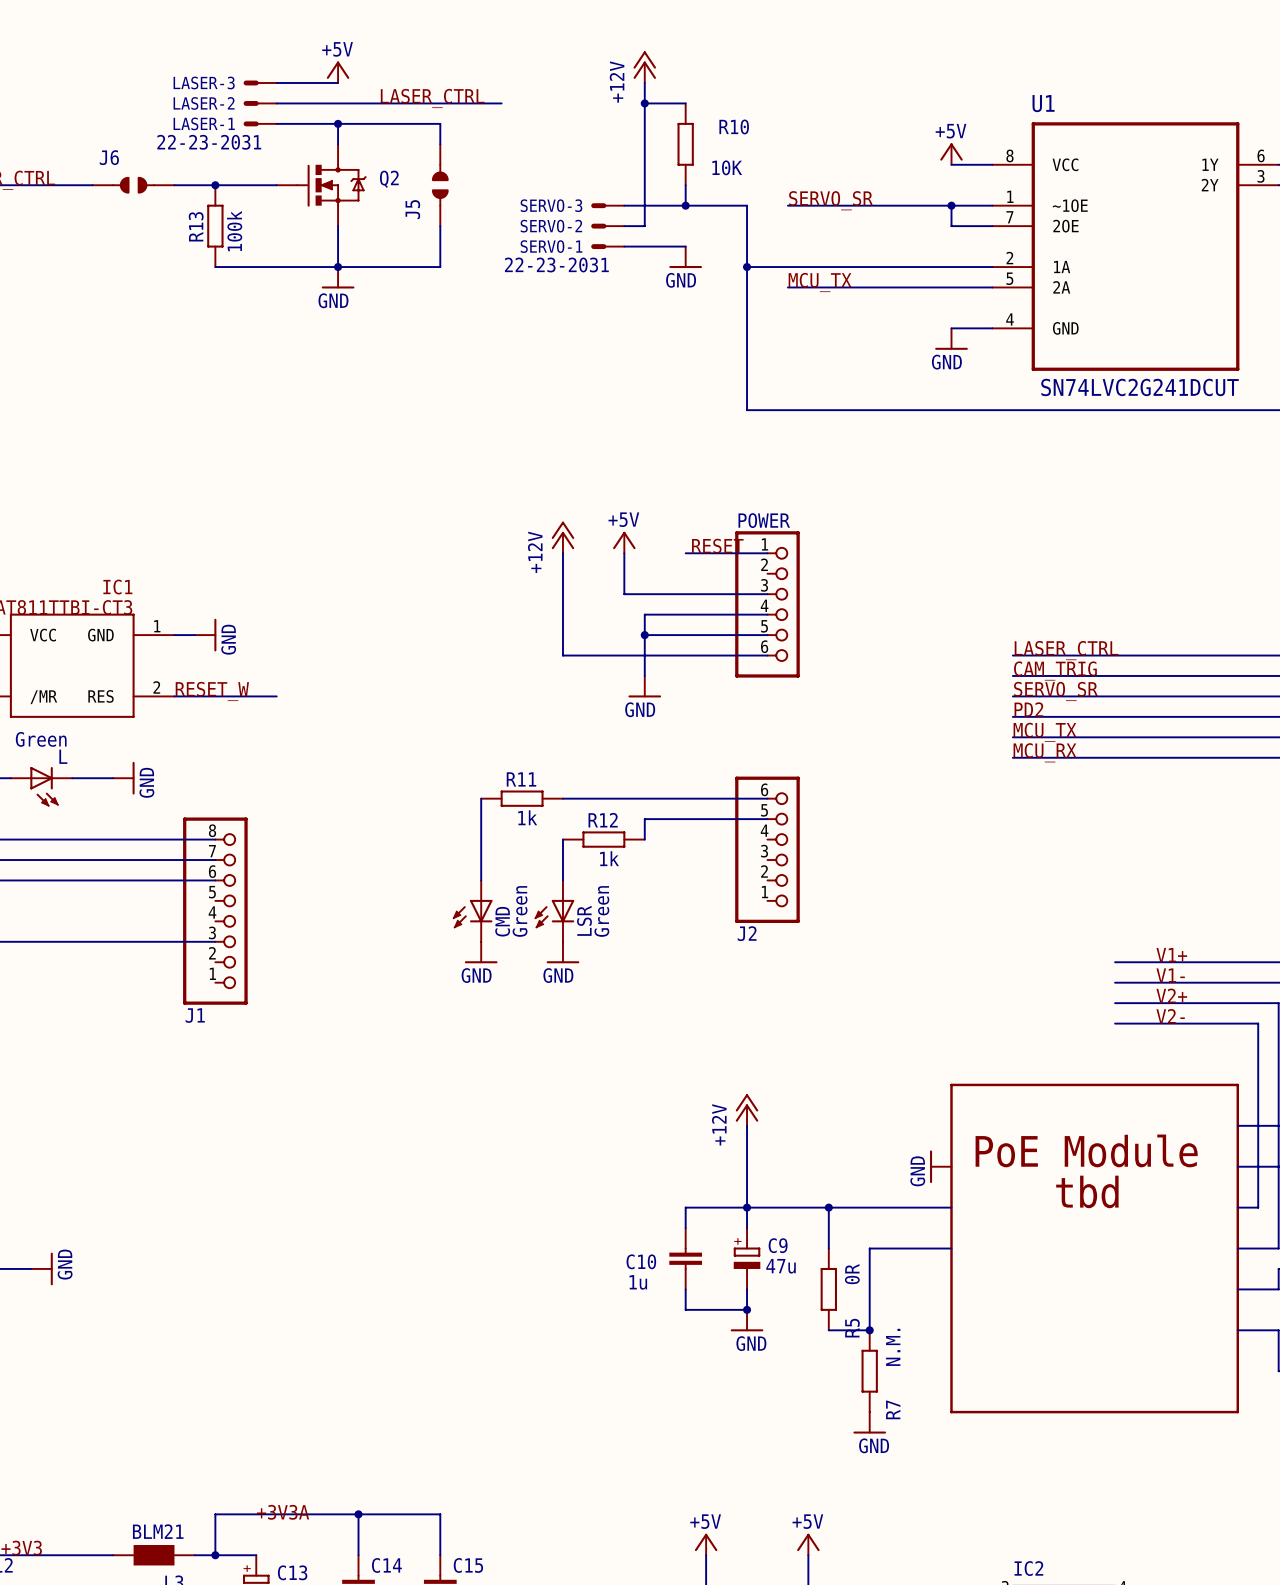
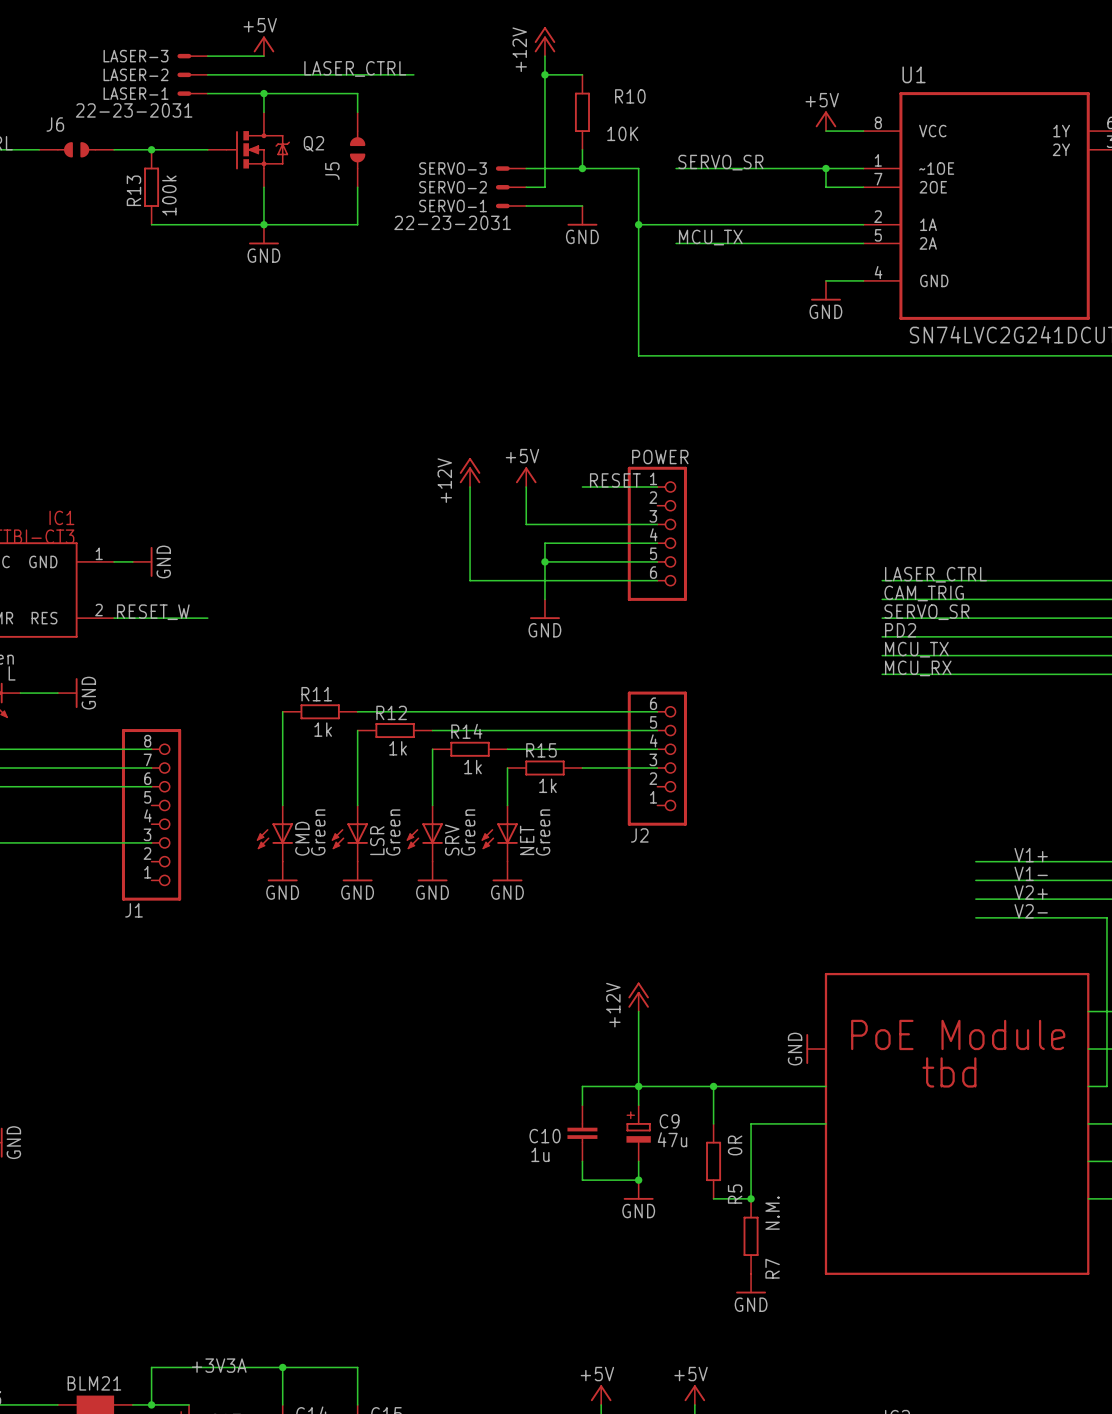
wire: none -> (282, 711) (282, 805)
wire: none -> (357, 711) (470, 711)
wire: (481, 798) (481, 880) -> (357, 730) (357, 805)
R11 position: (522, 798) -> (320, 711)
wire: (644, 819) (644, 839) -> (544, 730) (432, 730)
wire: none -> (432, 749) (432, 805)
wire: (562, 839) (562, 880) -> (507, 768) (507, 805)
R14: none -> 1k (470, 749)
wire: none -> (507, 749) (657, 749)
R12 position: (603, 839) -> (395, 730)
R15: none -> 1k (544, 768)
wire: none -> (582, 768) (657, 768)
CMD position: (472, 911) -> (274, 833)
LSR position: (554, 911) -> (349, 833)
SRV: none -> Green (424, 833)
NET: none -> Green (499, 833)
power symbol: GND (481, 952) -> none
power symbol: GND (562, 952) -> none
power symbol: none -> GND (282, 871)
power symbol: none -> GND (357, 871)
power symbol: none -> GND (432, 871)
power symbol: none -> GND (507, 871)

